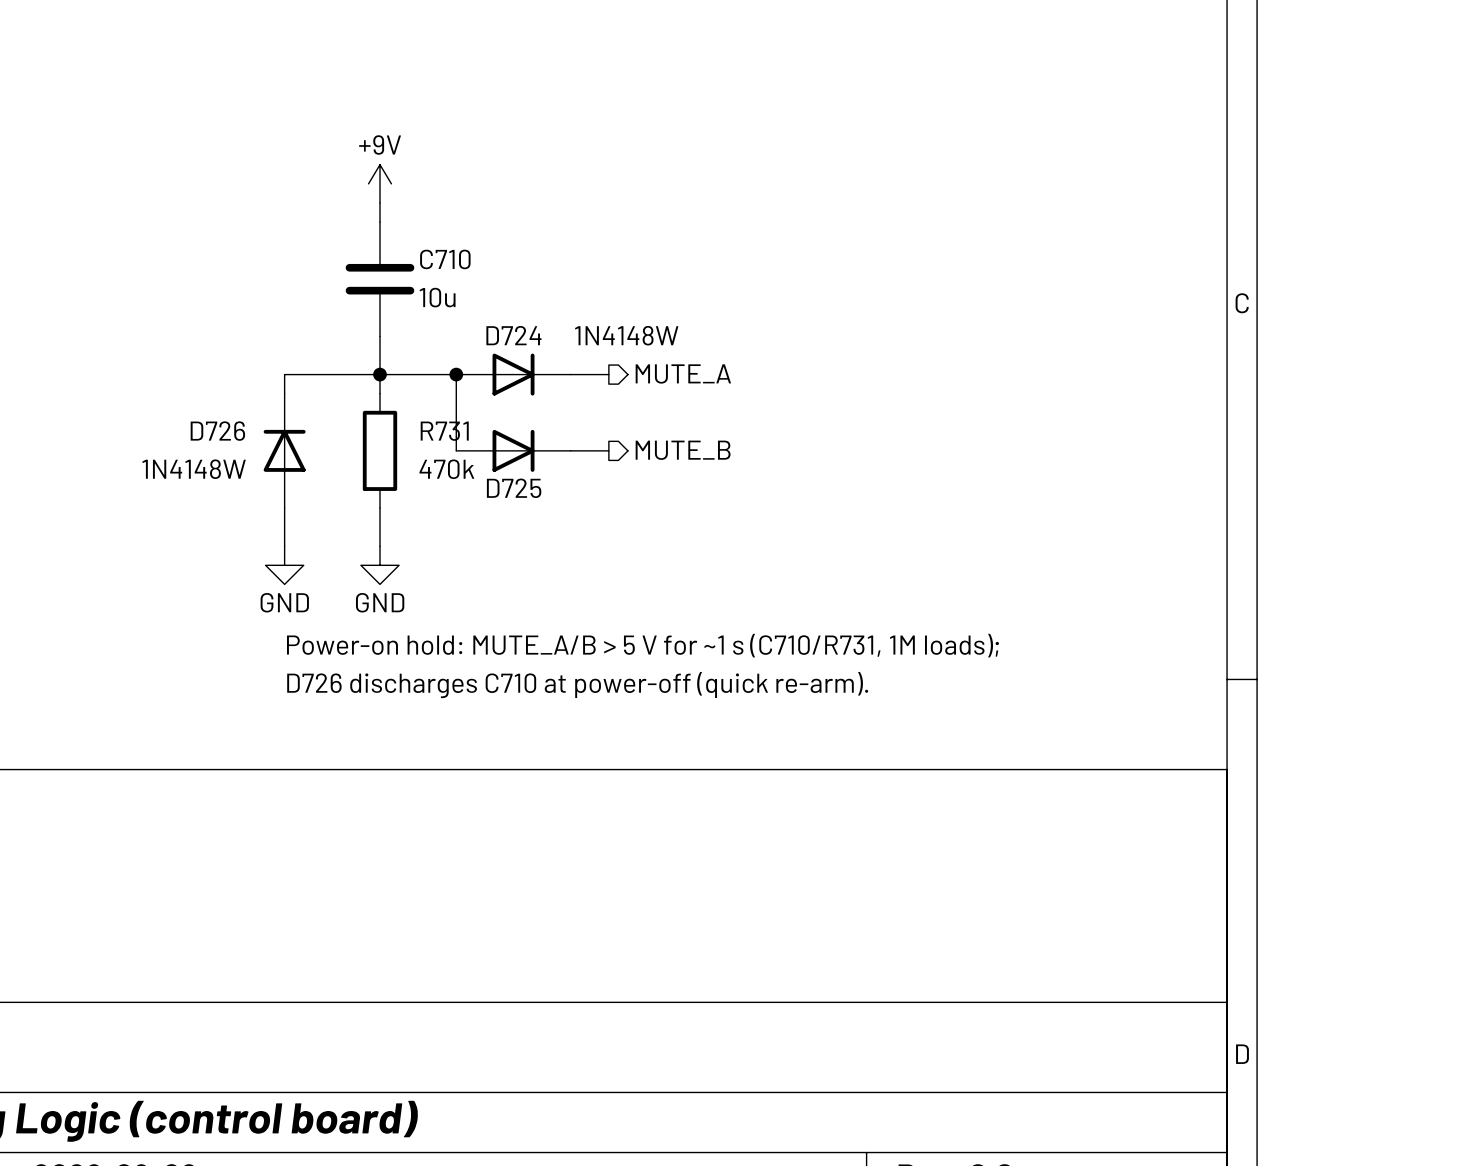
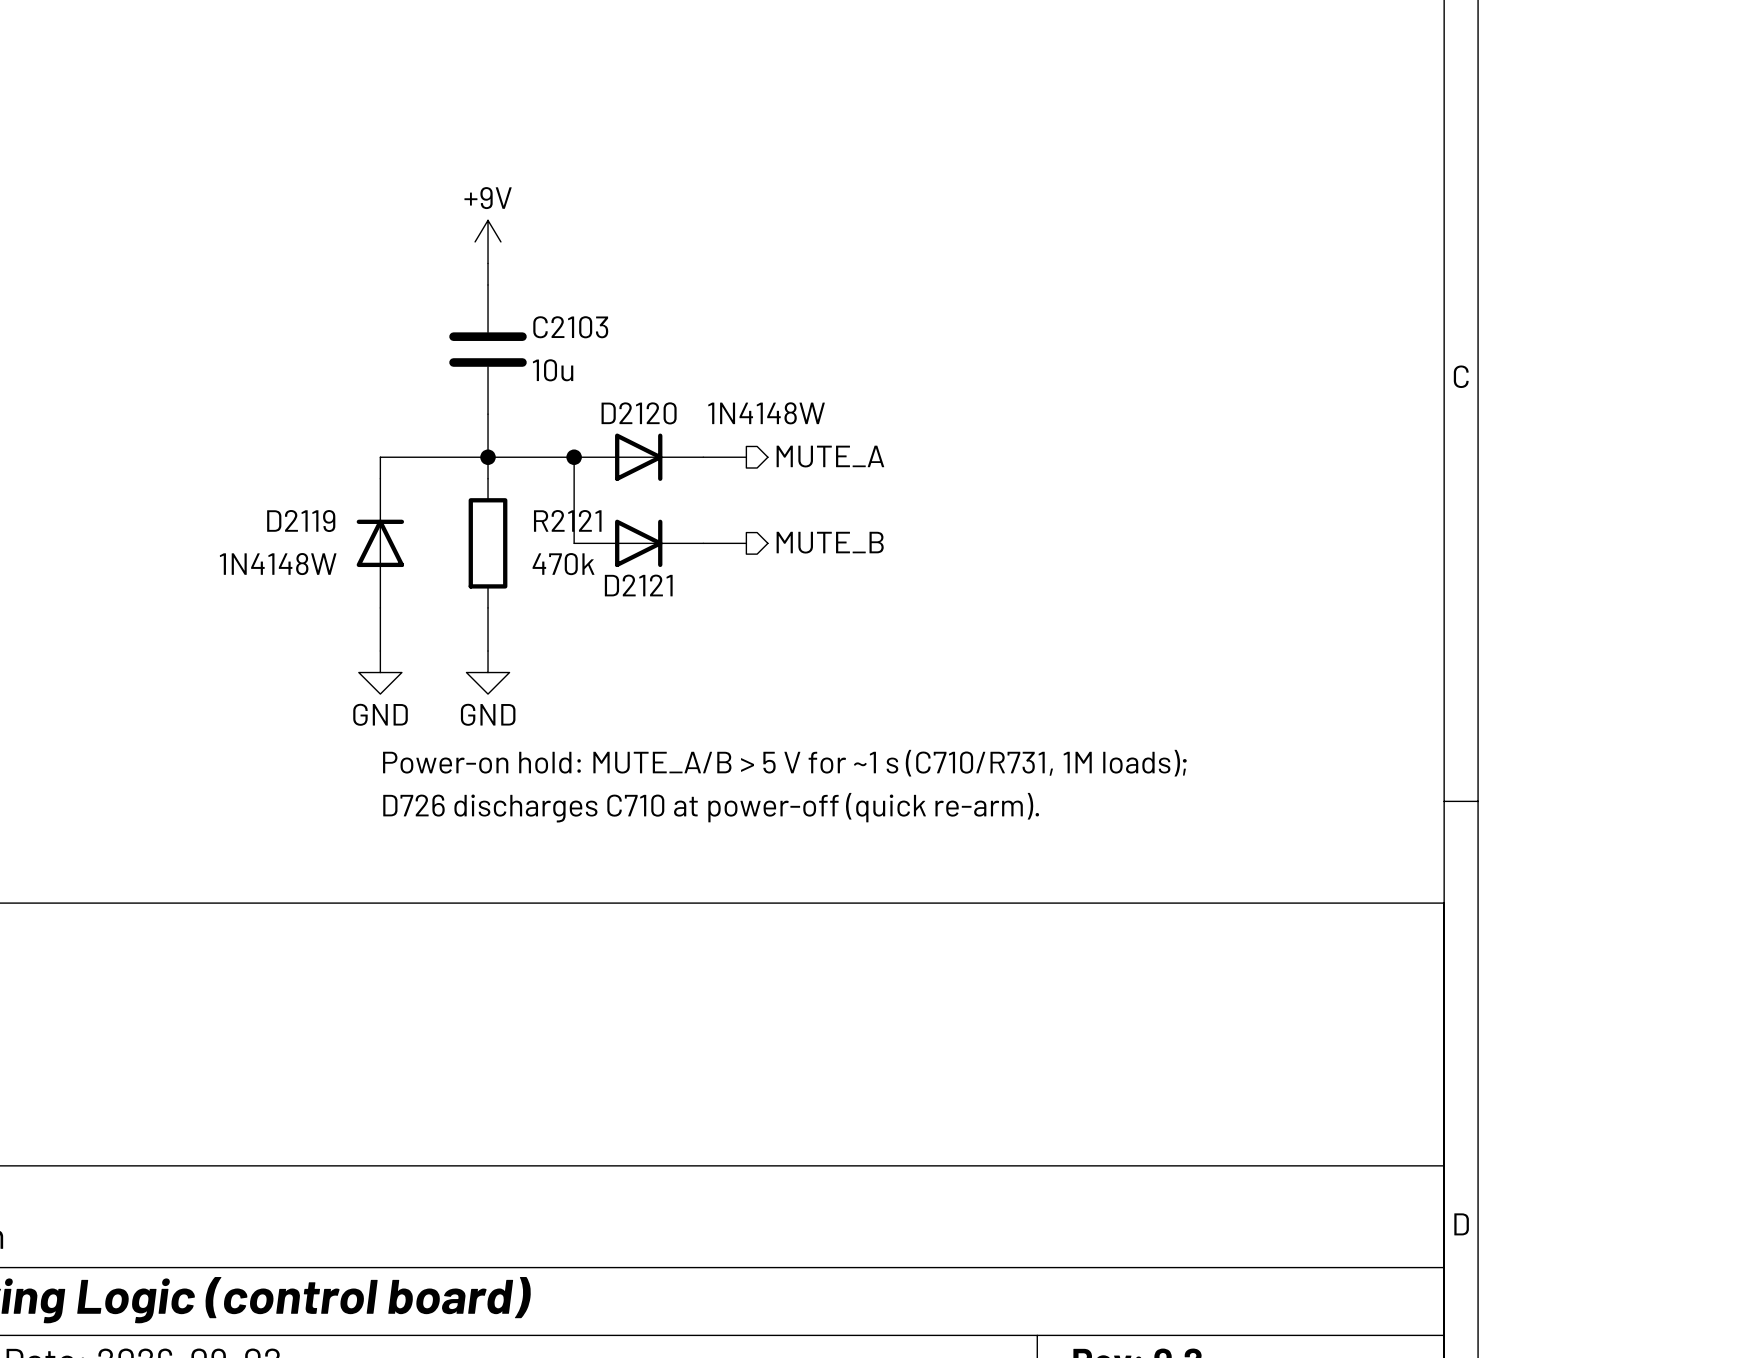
C710 name: C710 (445, 259) -> C2103 (570, 327)
D724 name: D724 (513, 335) -> D2120 (639, 413)
D726 name: D726 (217, 431) -> D2119 (301, 521)
R731 name: R731 (444, 431) -> R2121 (567, 520)
D725 name: D725 (514, 488) -> D2121 (638, 585)

